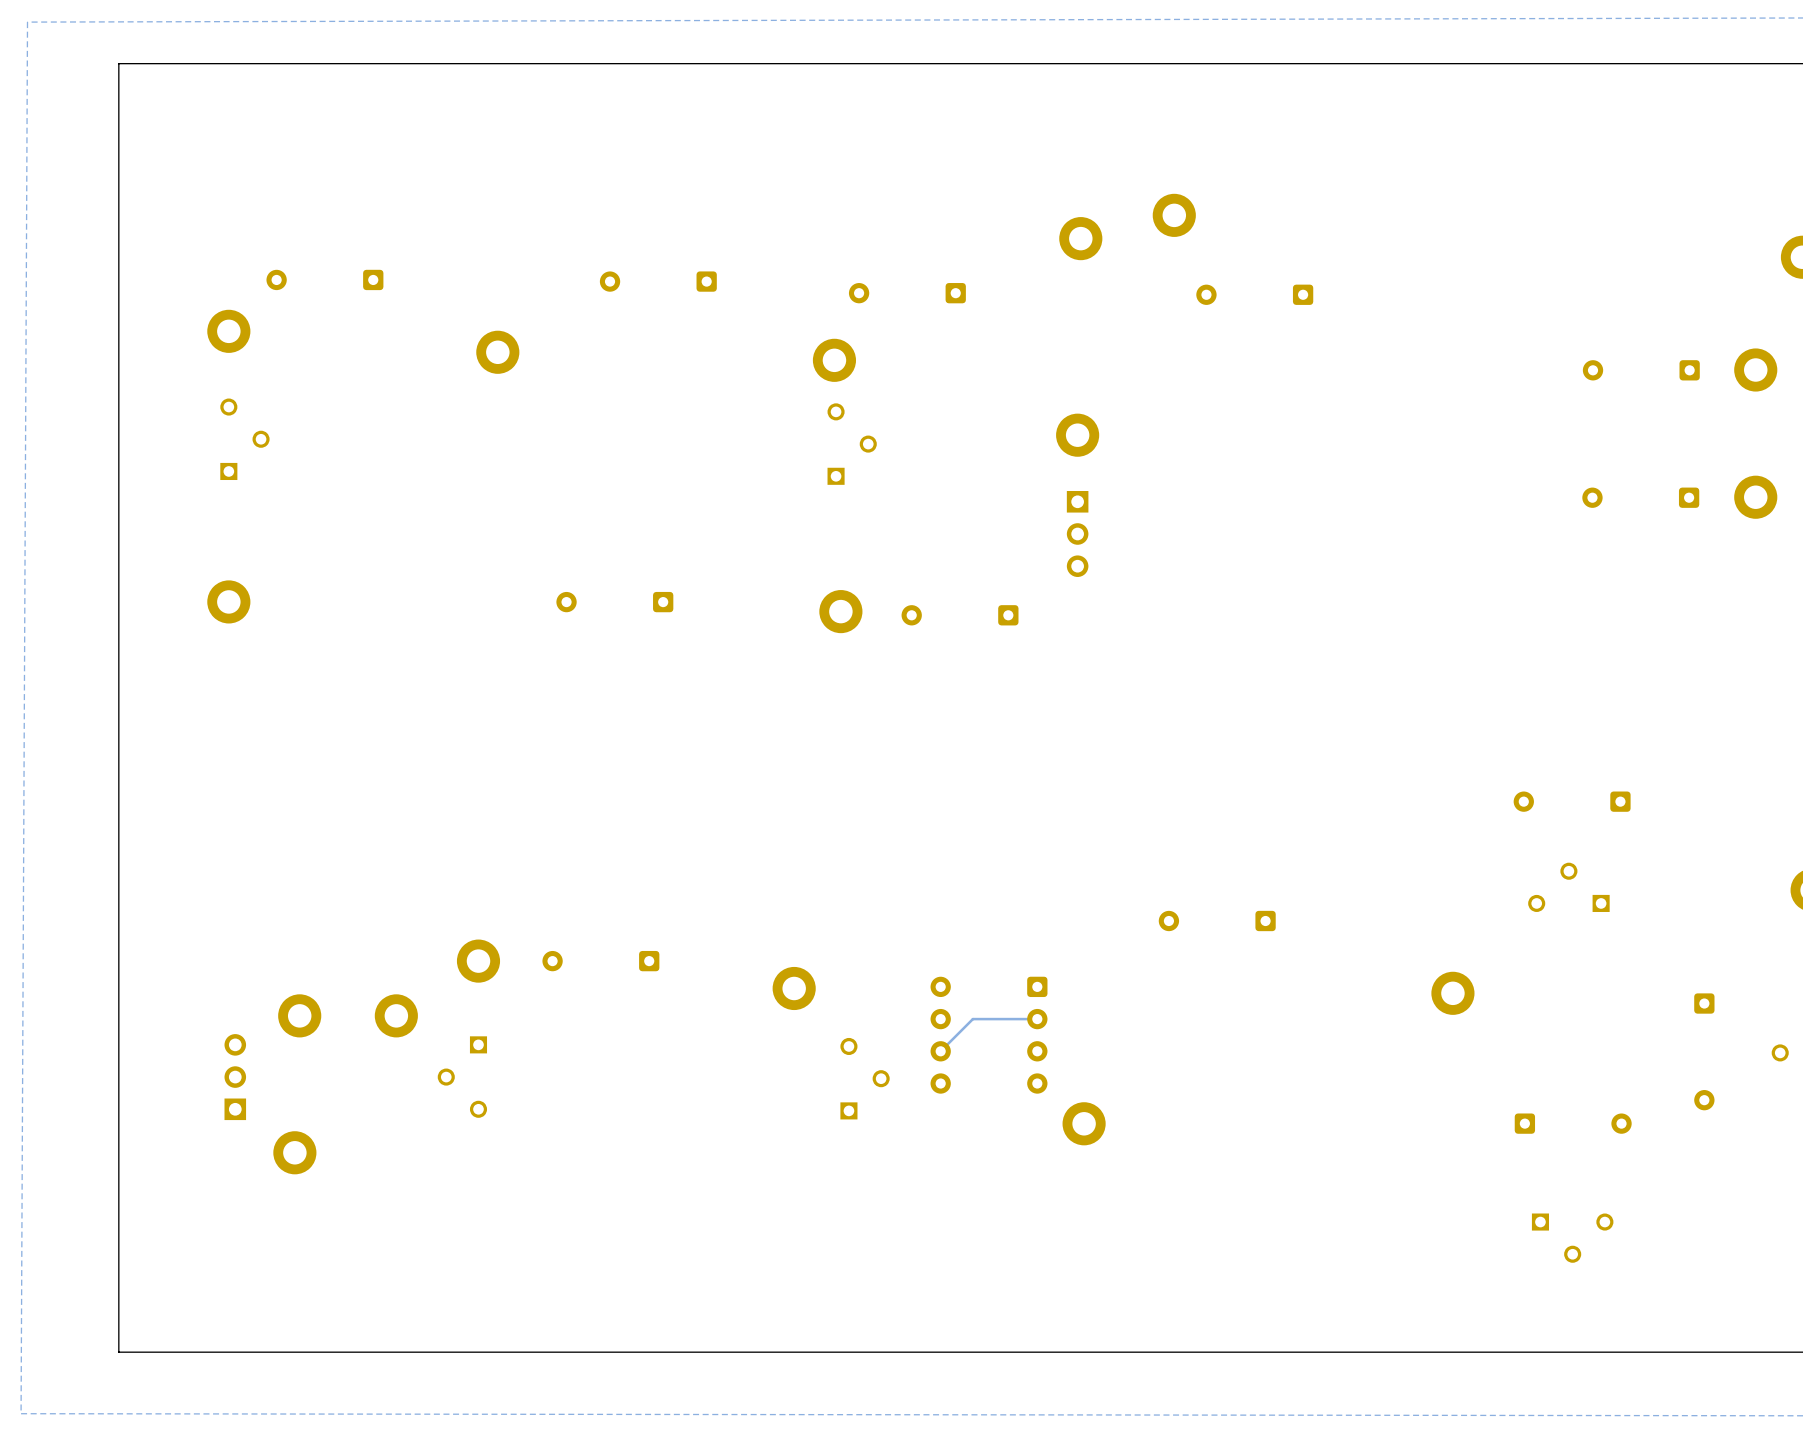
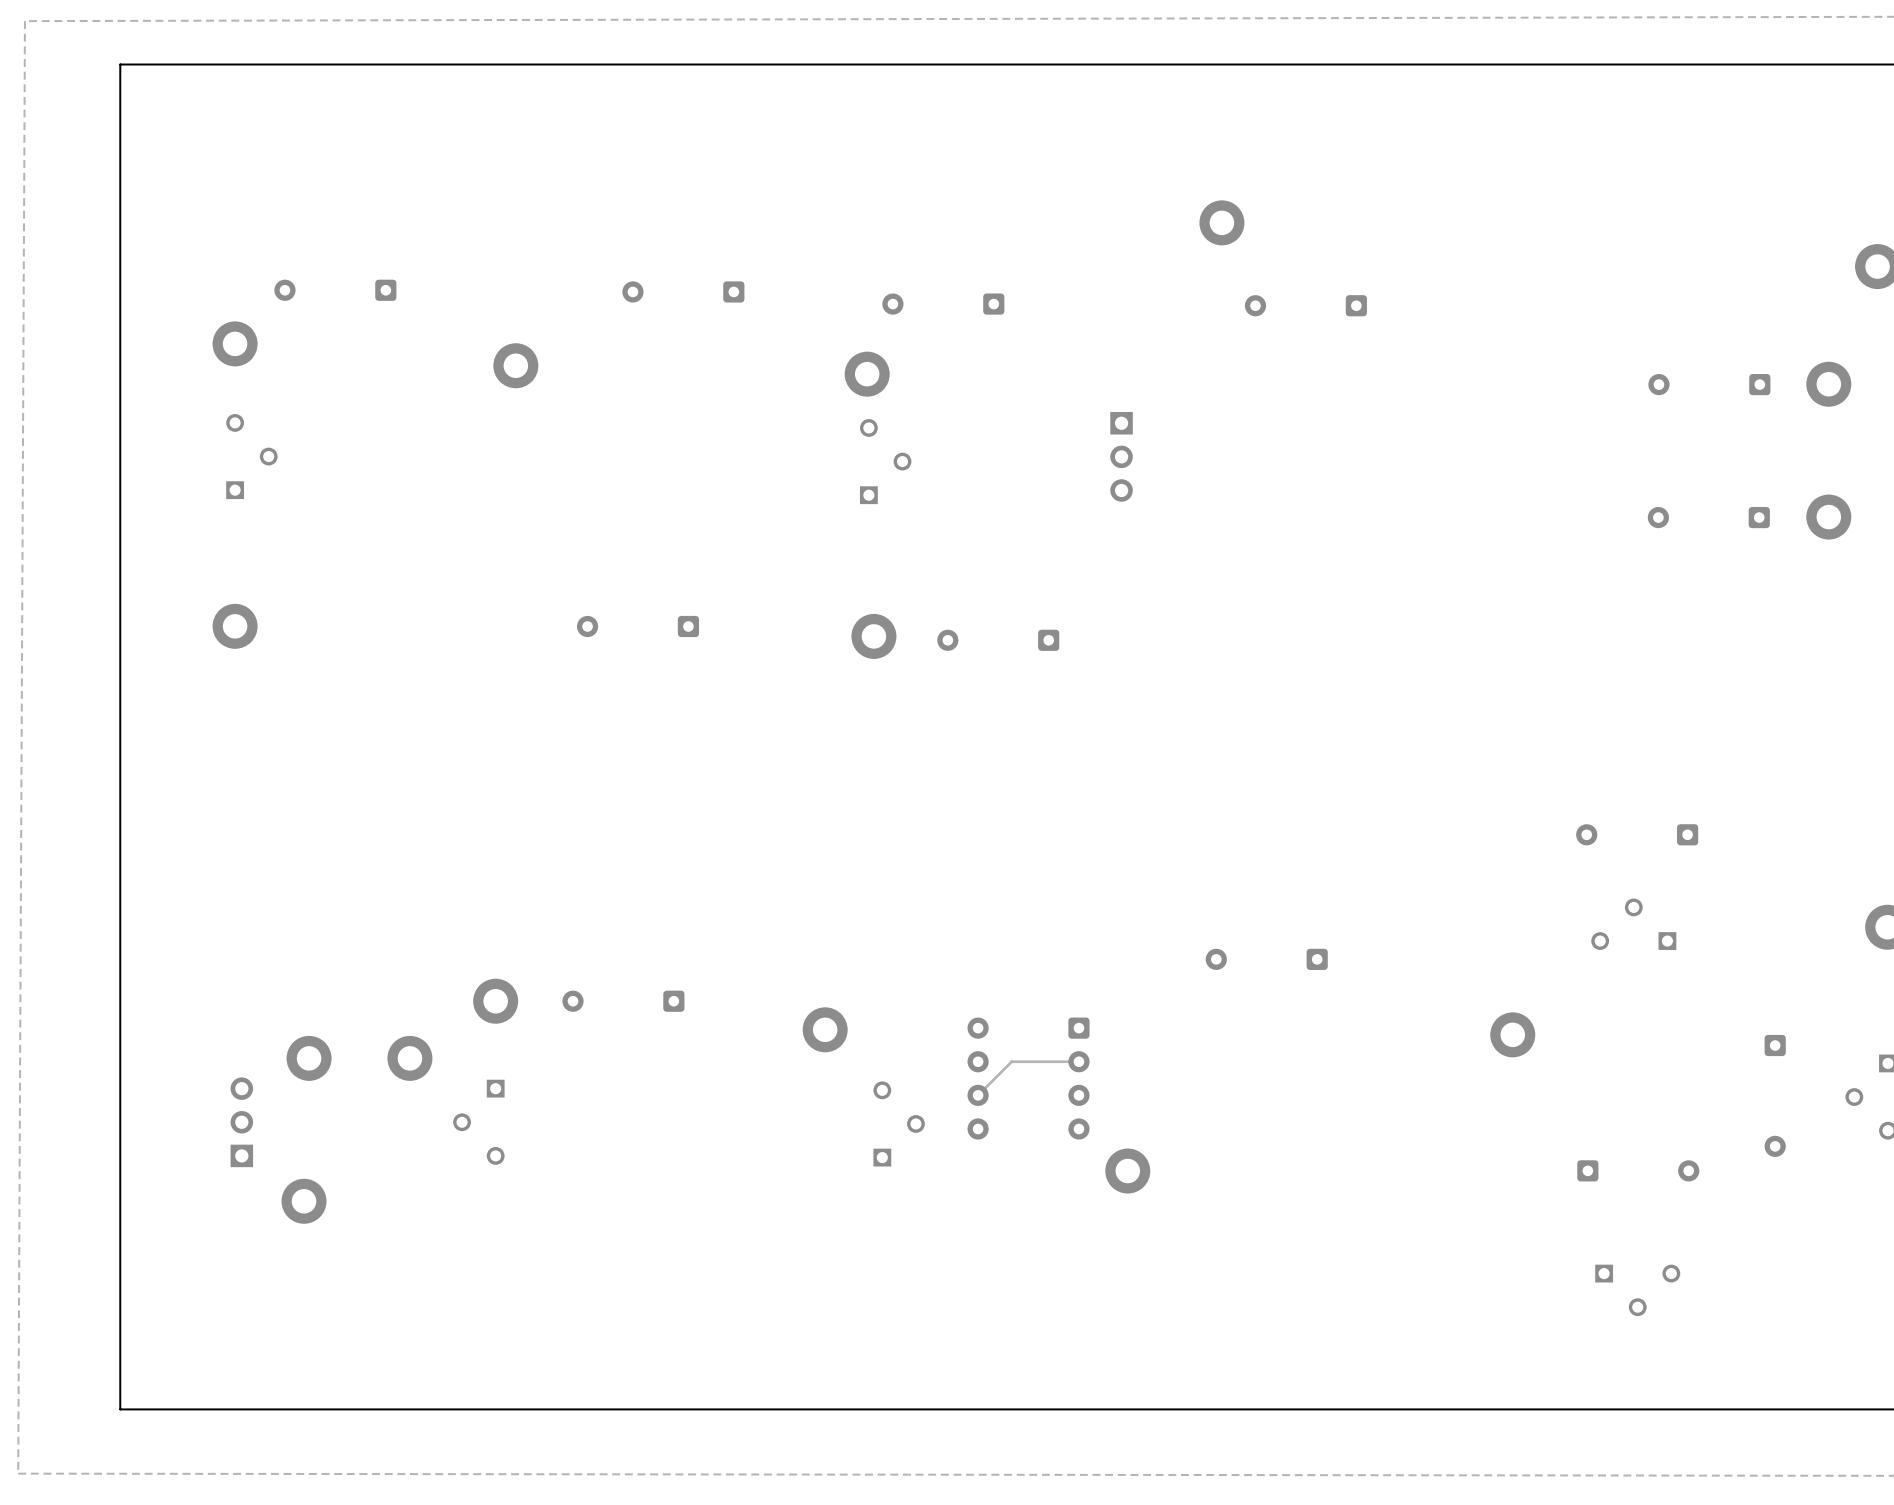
part: (1080, 238) -> none
part footprint: [1056, 413, 1100, 457] -> [1110, 412, 1133, 502]
part: (1077, 533) -> none

